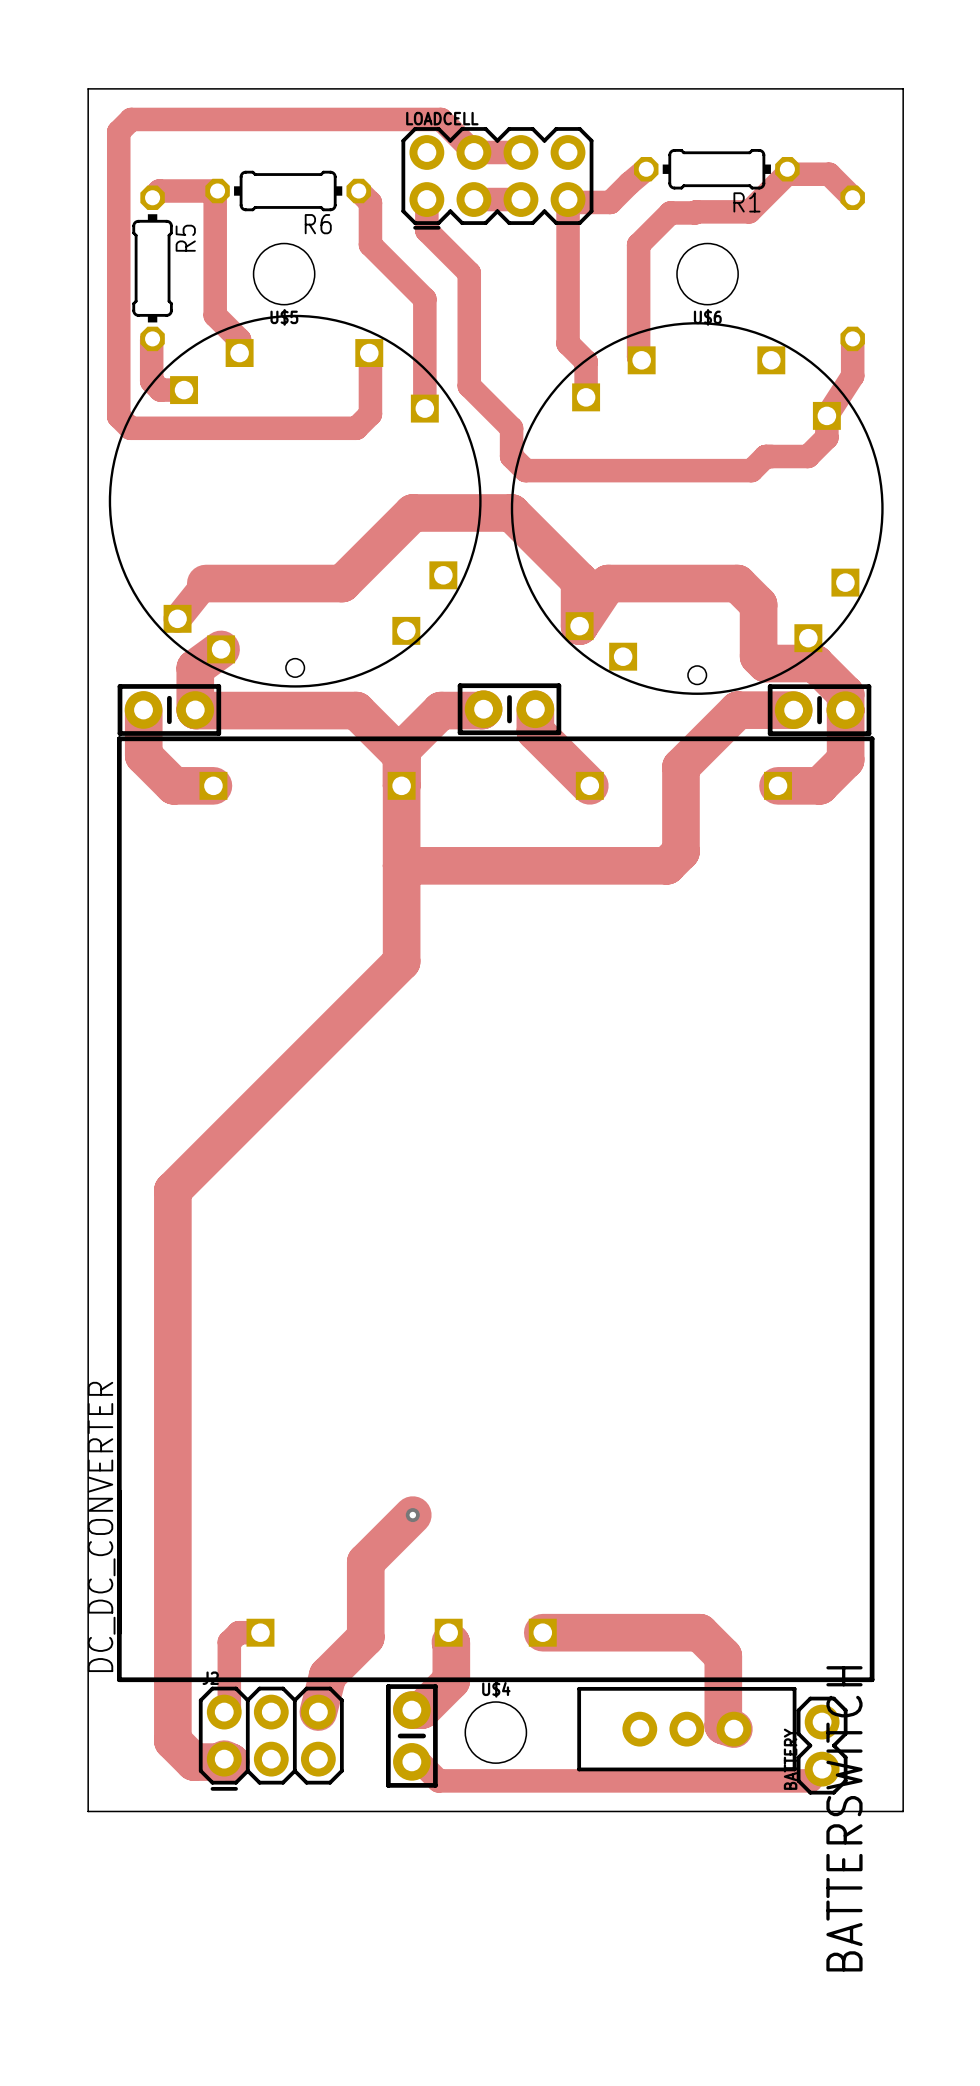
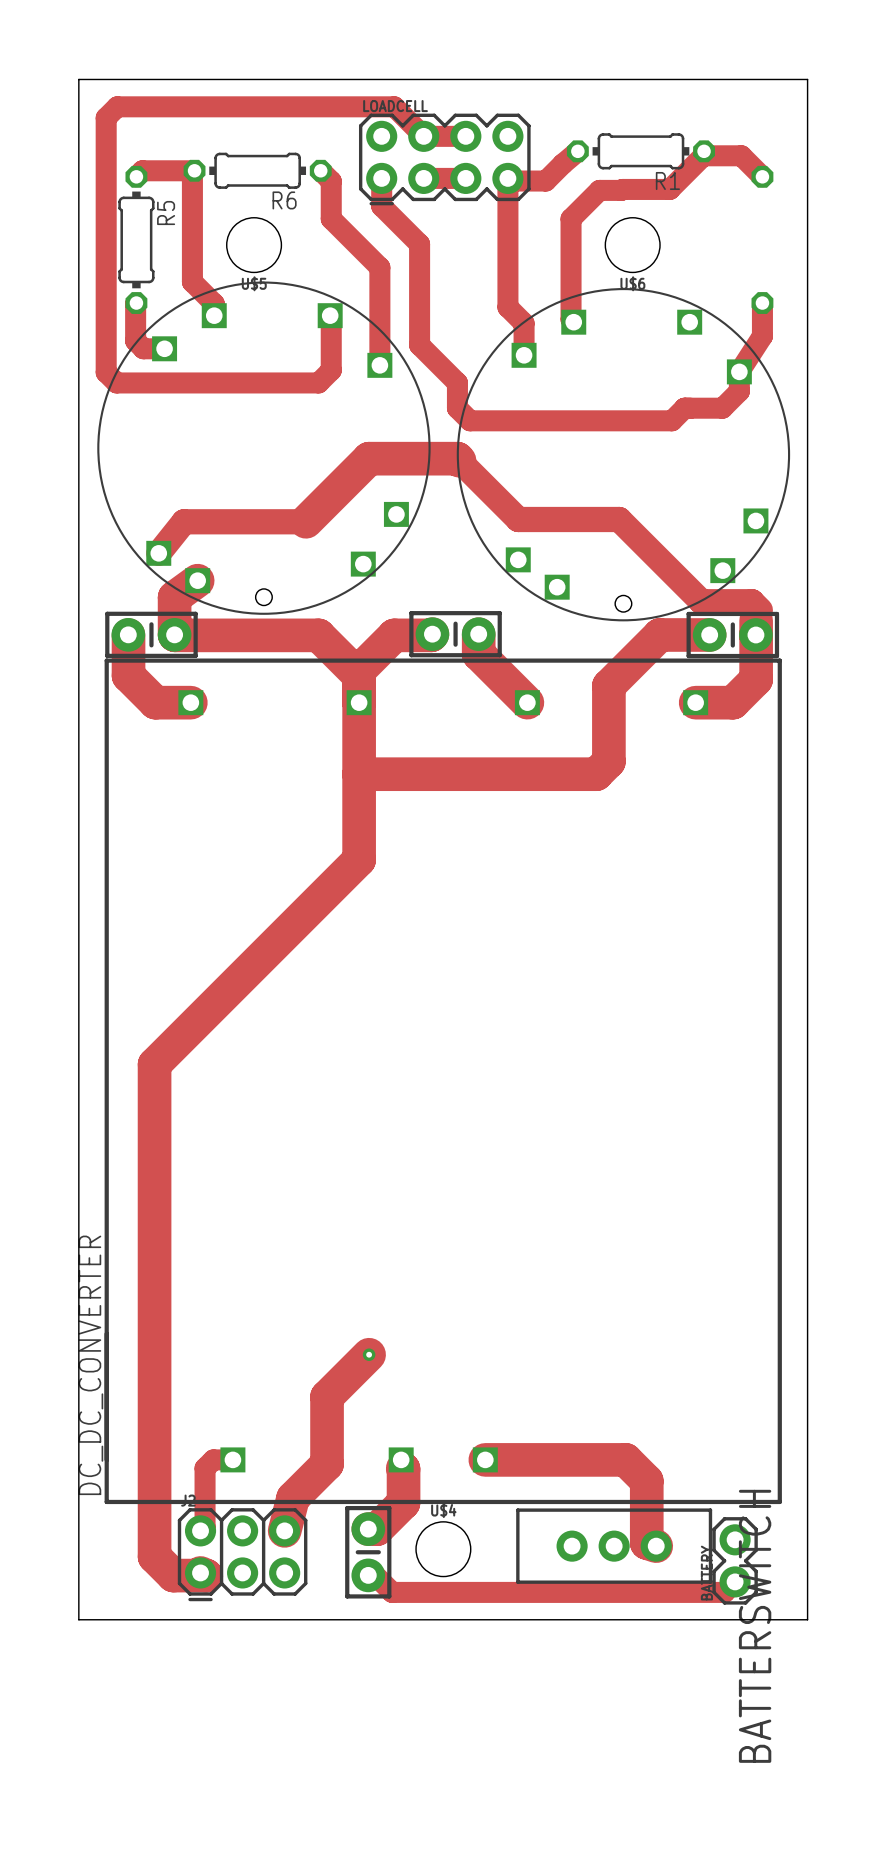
track width: thick (513, 515) (579, 580) -> thin (459, 460) (518, 519)
track: (579, 580) (579, 626) (608, 583) (737, 583) (758, 604) (758, 656) (765, 663) (815, 663) (845, 694) -> (518, 519) (619, 519) (701, 601) (751, 601) (760, 610)
track width: thick (205, 583) (342, 583) -> thin (184, 521) (306, 521)

